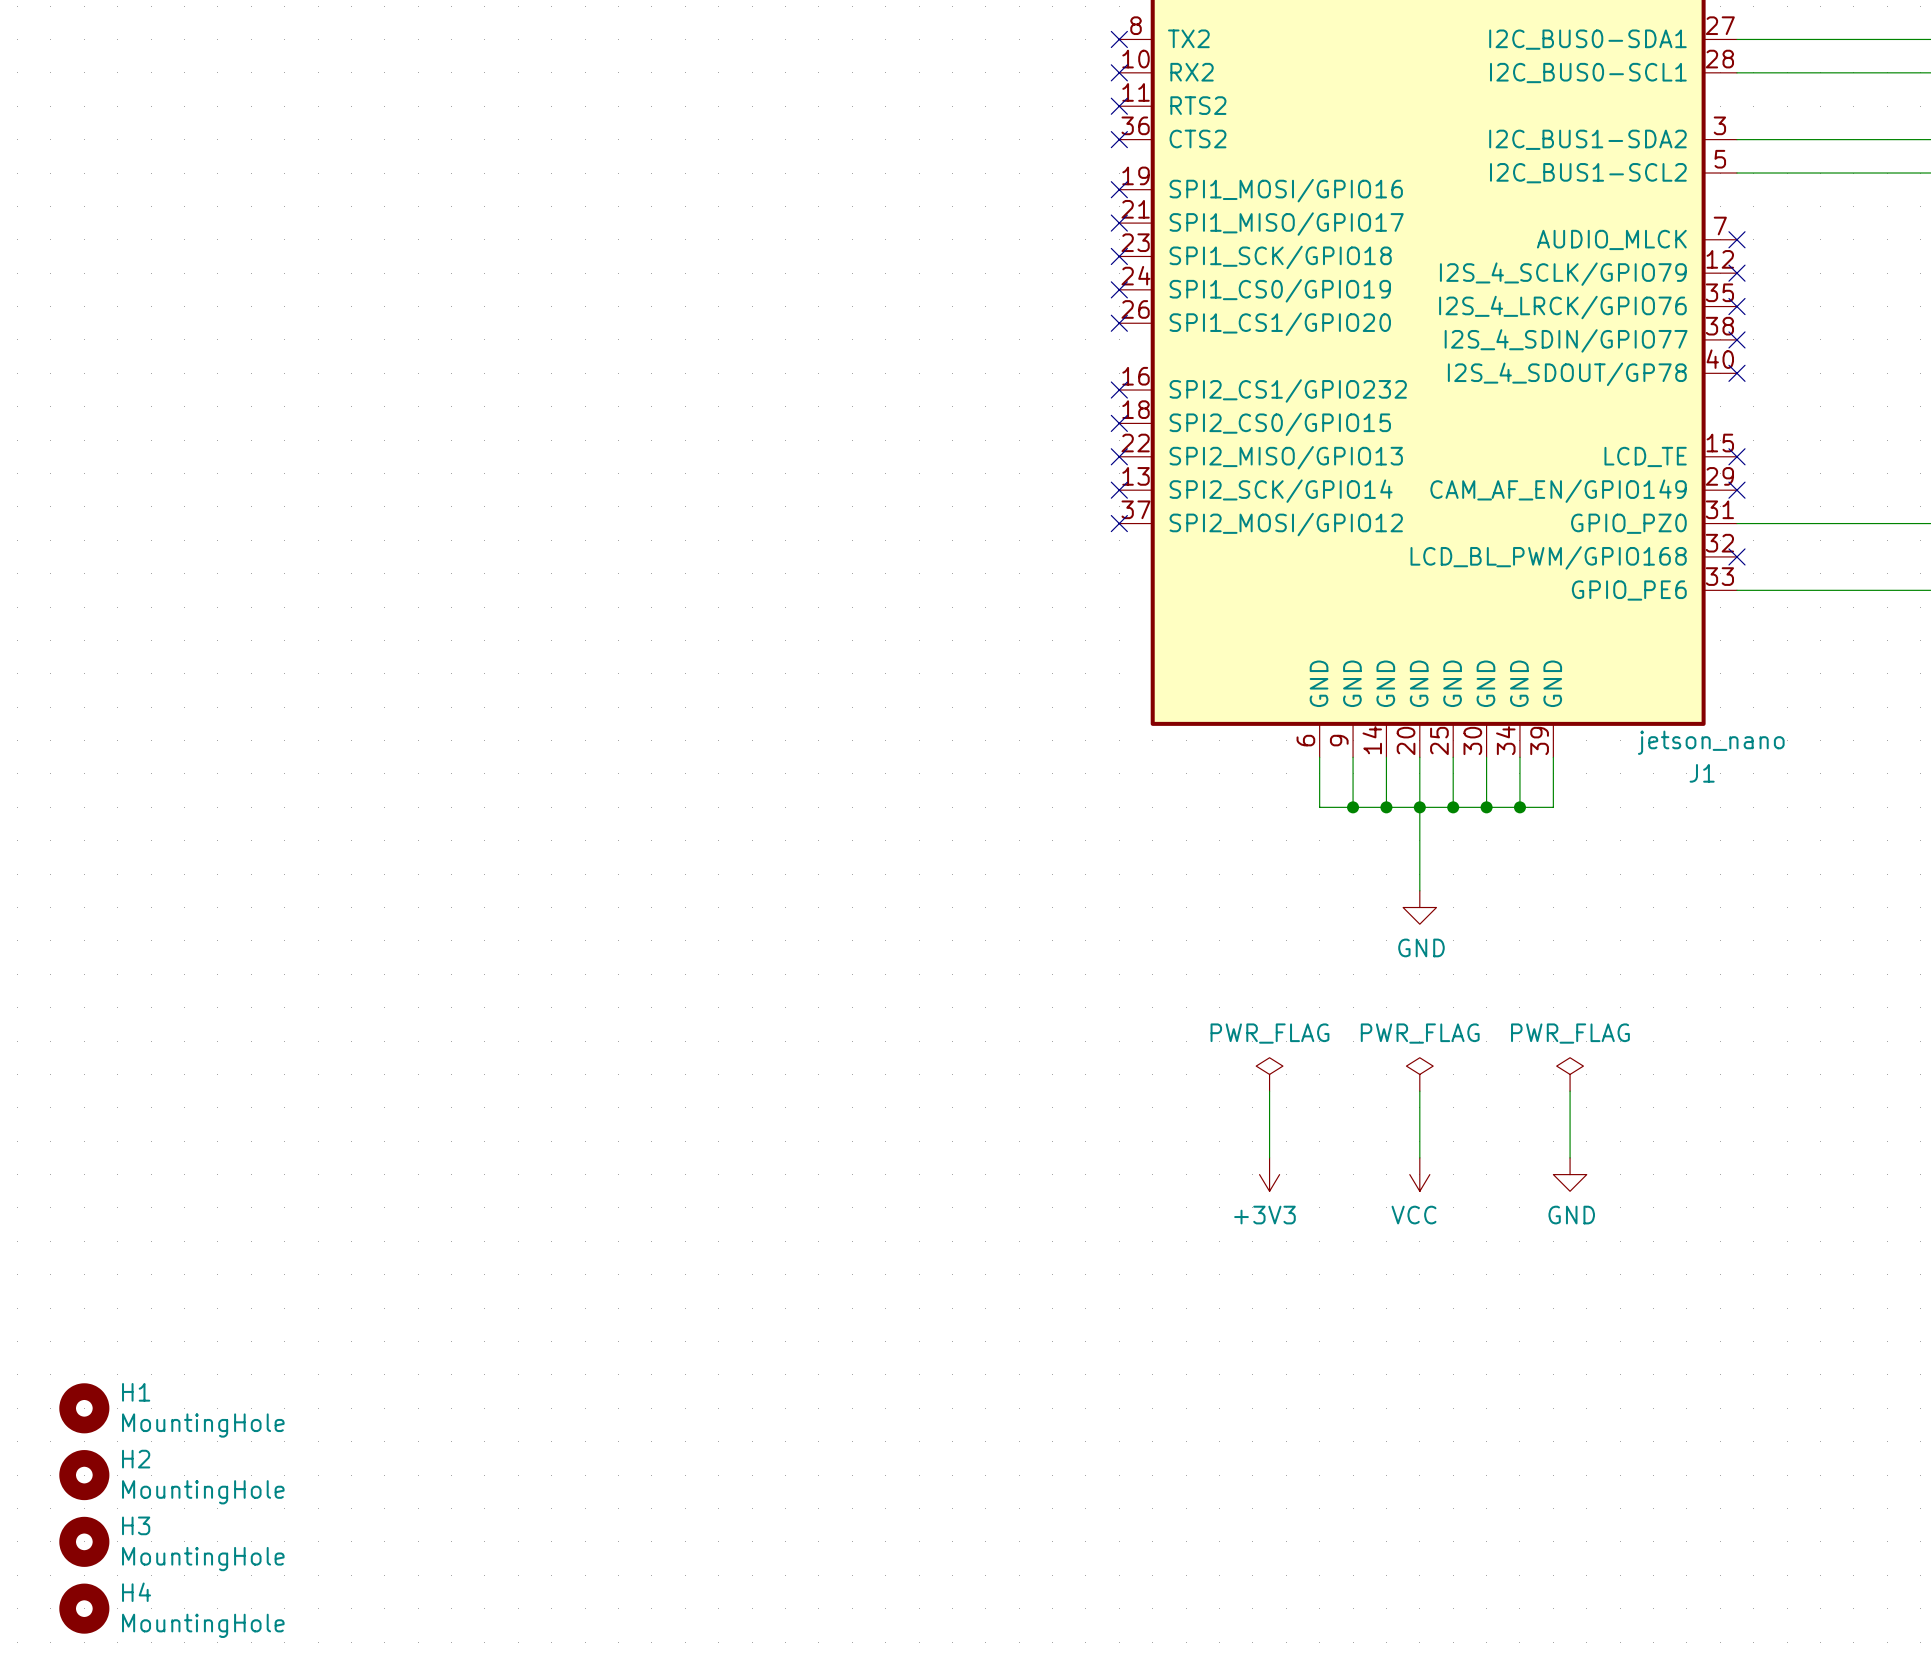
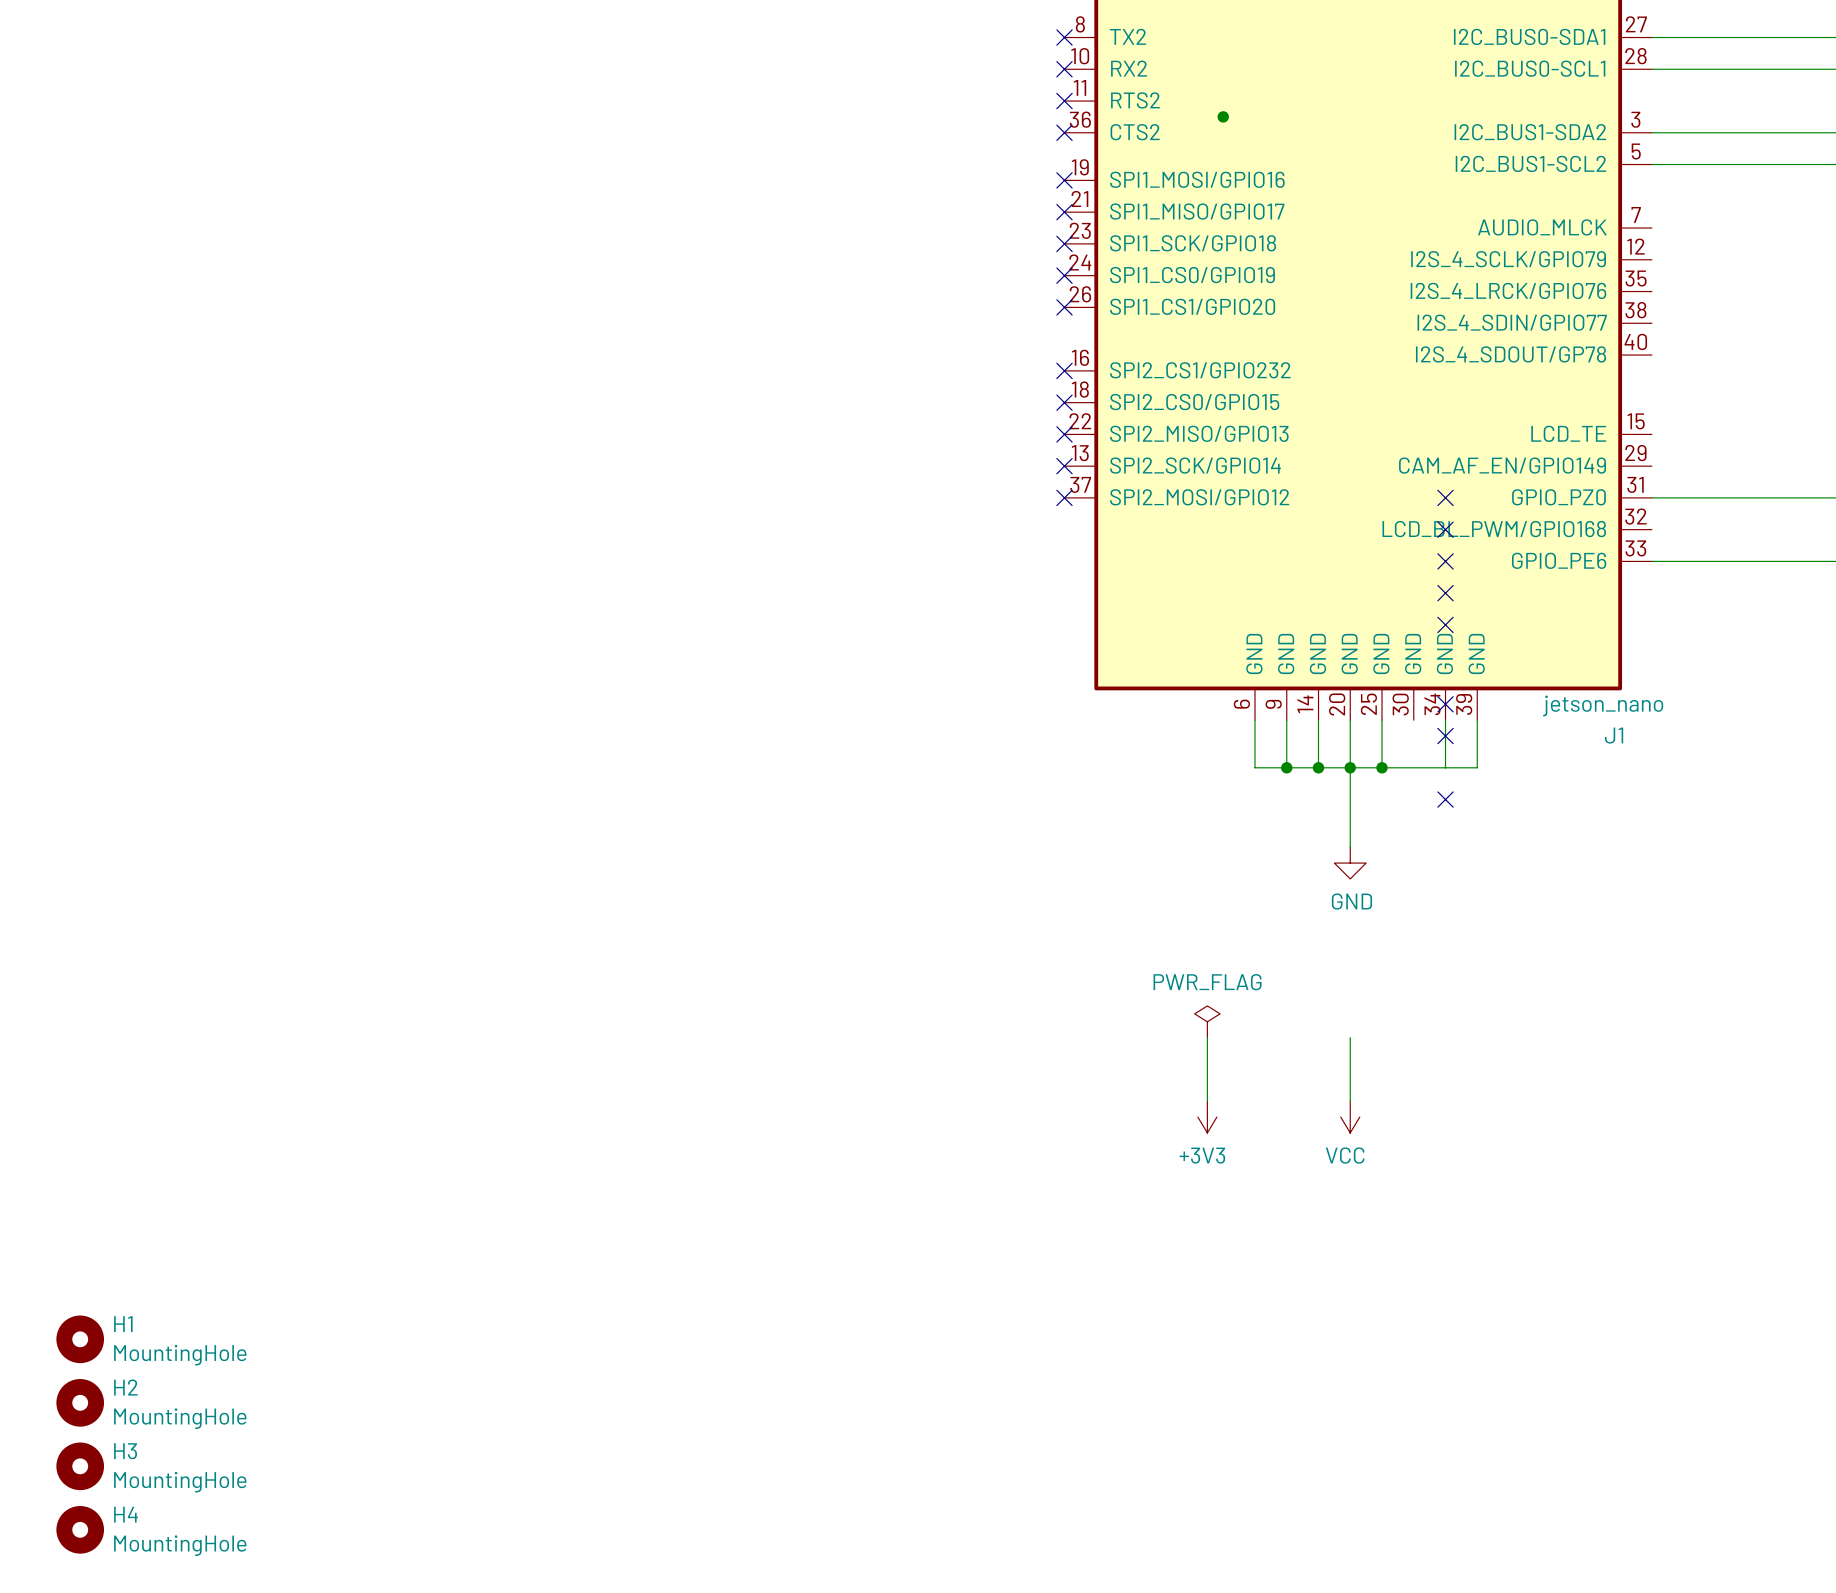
junction: none -> (1223, 116)
no-connect mark: (1736, 239) -> none
no-connect mark: (1736, 273) -> none
no-connect mark: (1736, 306) -> none
no-connect mark: (1736, 339) -> none
no-connect mark: (1736, 373) -> none
no-connect mark: (1736, 456) -> none
no-connect mark: (1736, 490) -> none
no-connect mark: none -> (1445, 497)
no-connect mark: none -> (1445, 529)
no-connect mark: (1736, 556) -> none
no-connect mark: none -> (1445, 561)
no-connect mark: none -> (1445, 593)
no-connect mark: none -> (1445, 624)
no-connect mark: none -> (1445, 704)
J1 value position: jetson_nano (1711, 742) -> jetson_nano (1603, 705)
wire: (1486, 757) (1486, 807) -> none
no-connect mark: none -> (1445, 736)
junction: (1486, 807) -> none
junction: (1519, 807) -> none
no-connect mark: none -> (1445, 799)
power symbol: PWR_FLAG (1419, 1074) -> none
power symbol: PWR_FLAG (1570, 1074) -> none
wire: (1570, 1091) (1570, 1157) -> none
power symbol: GND (1570, 1174) -> none

